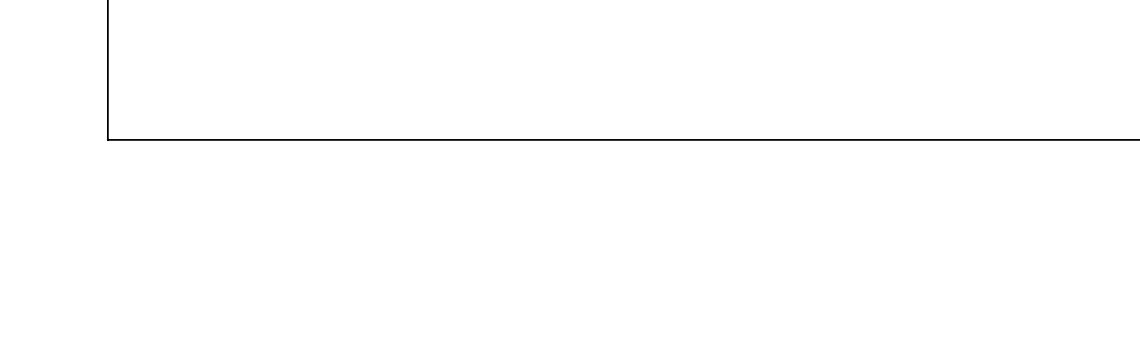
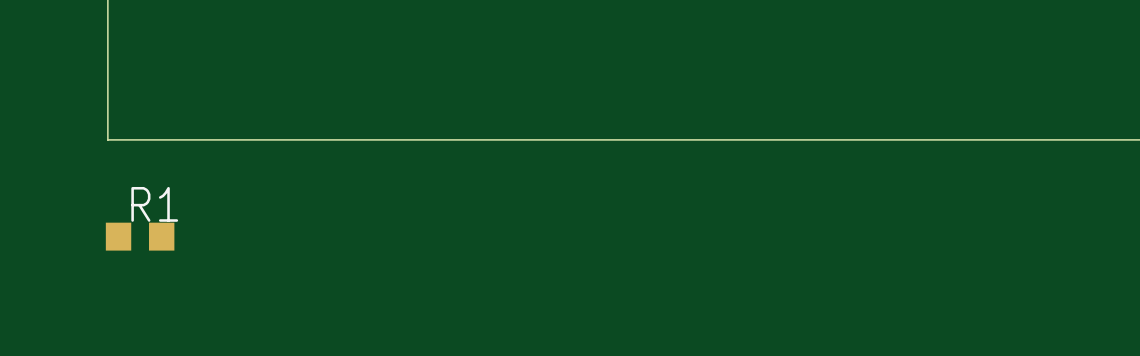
R1: none -> (140, 236)

